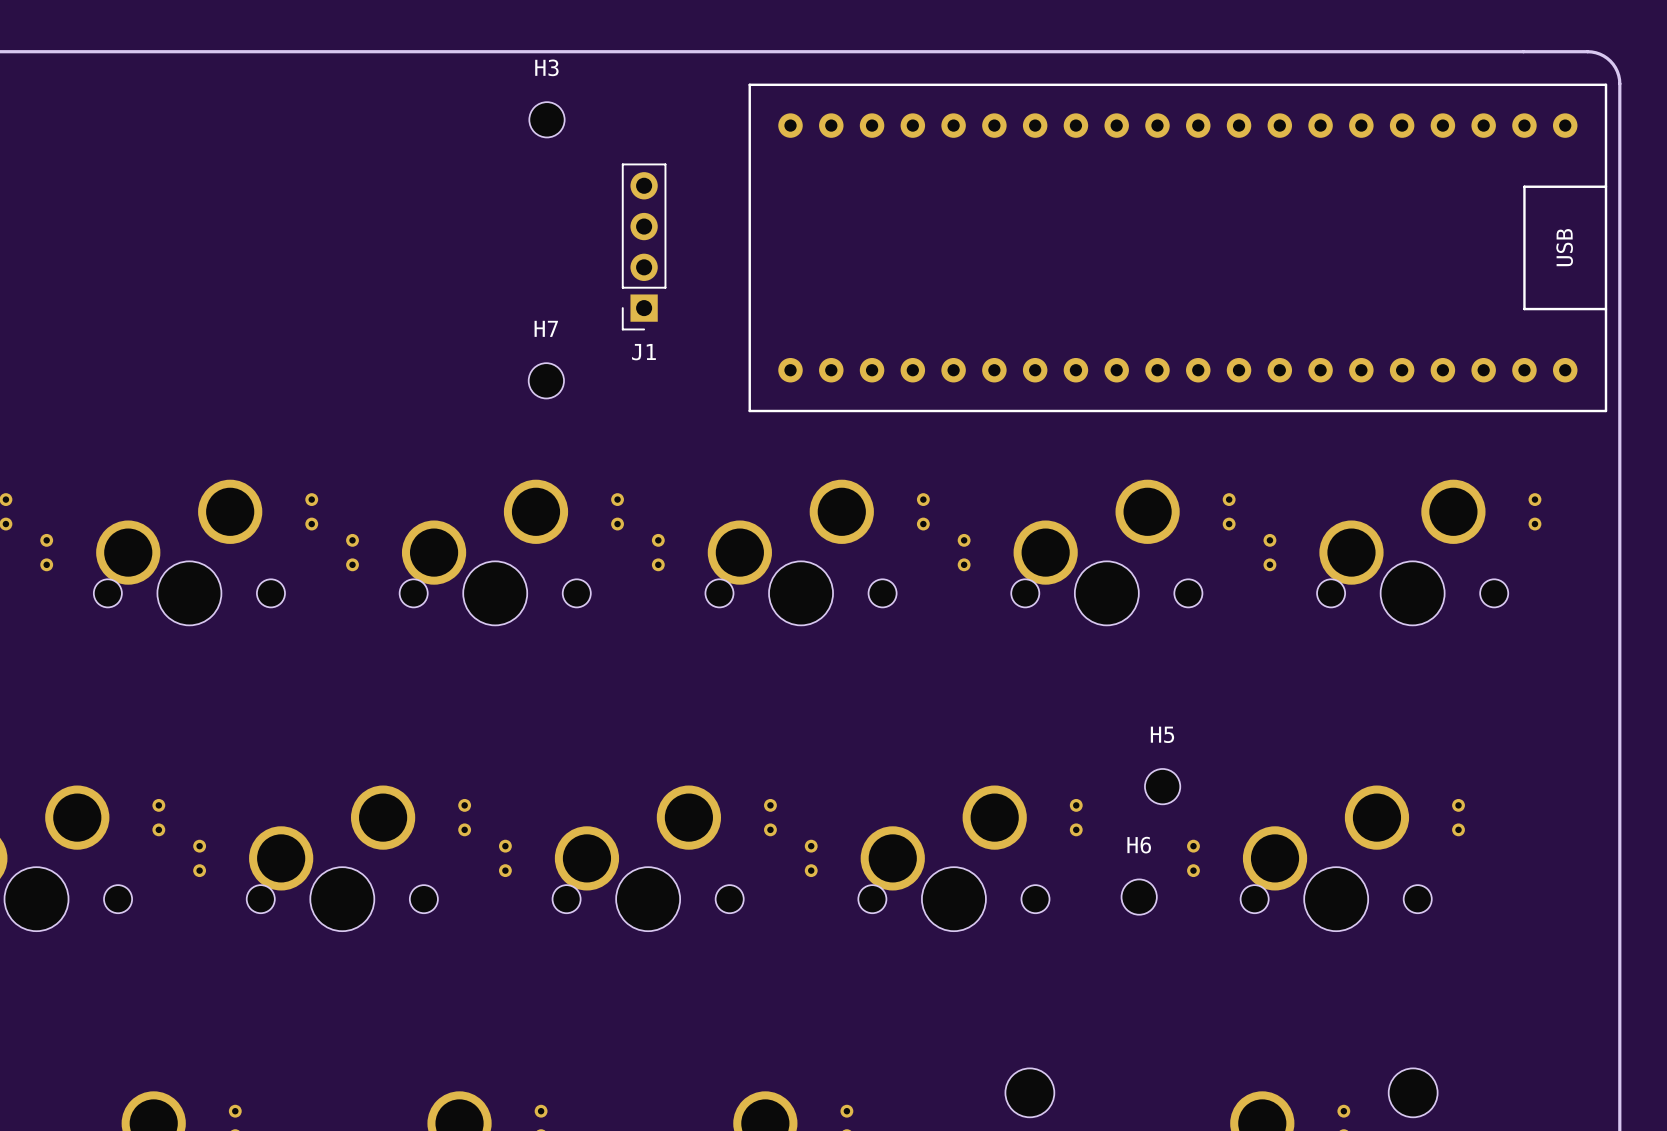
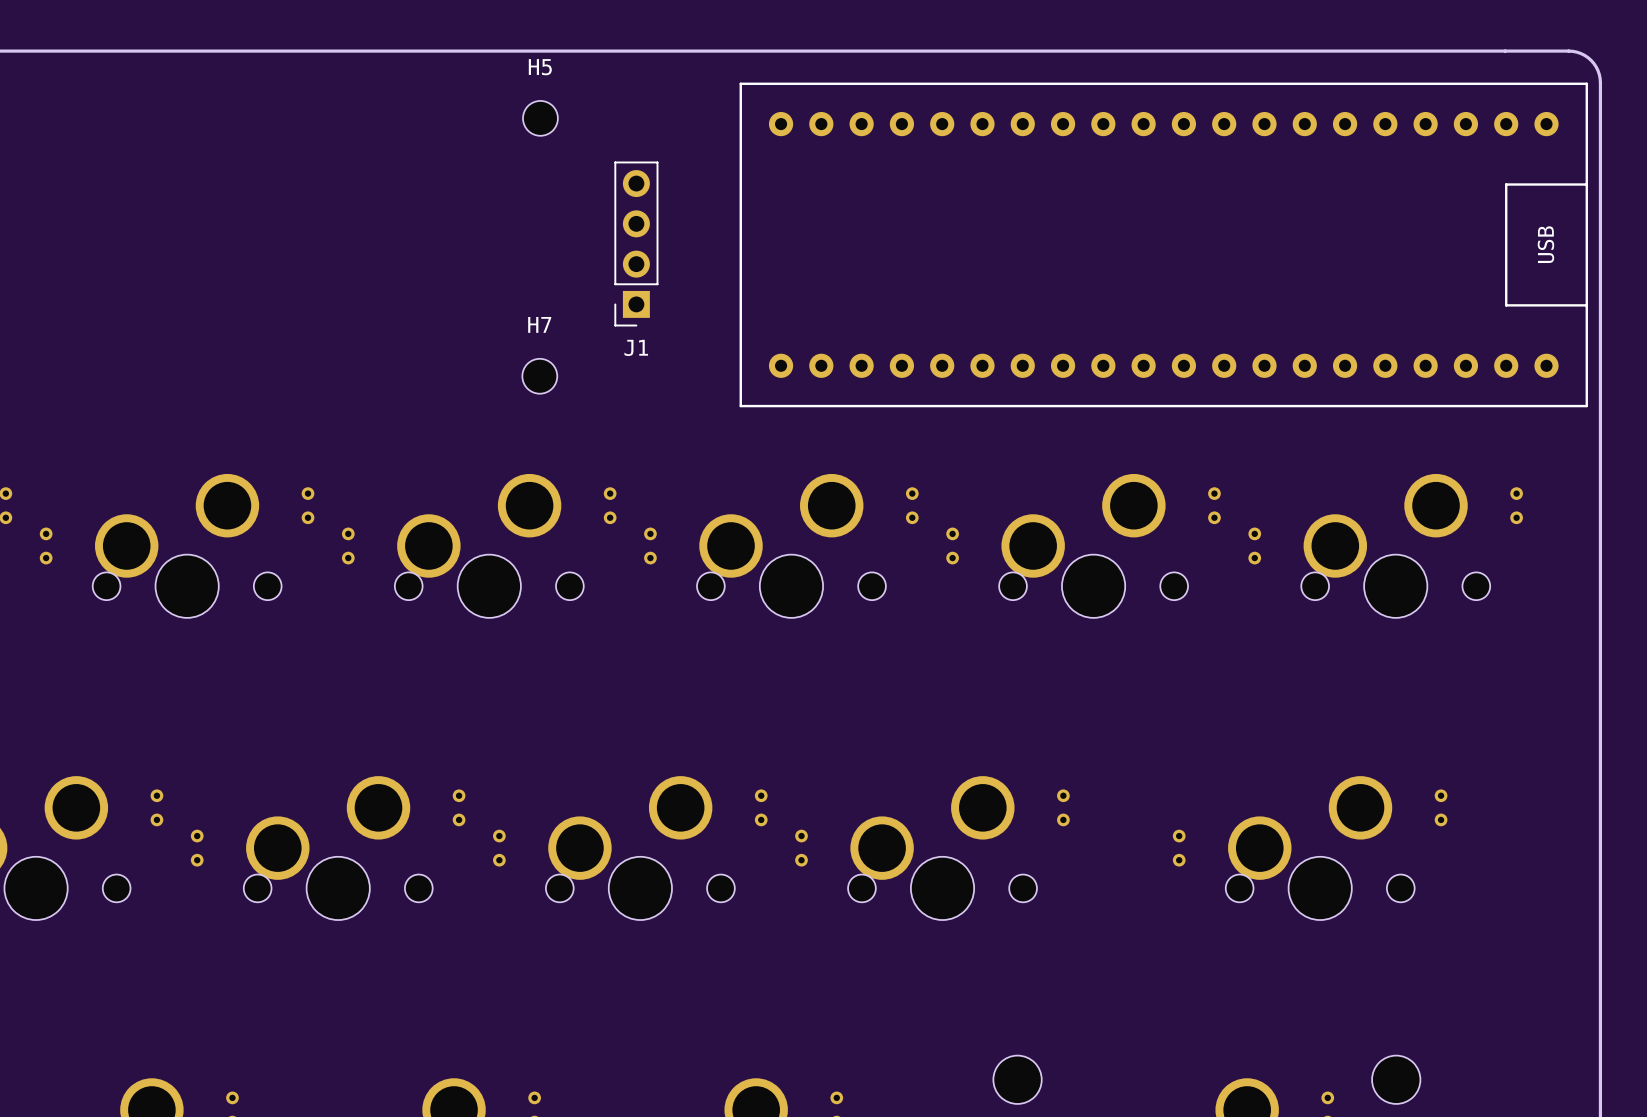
H3 name: H3 (546, 67) -> H5 (540, 67)
H5: (1162, 786) -> none
H6: (1139, 897) -> none

